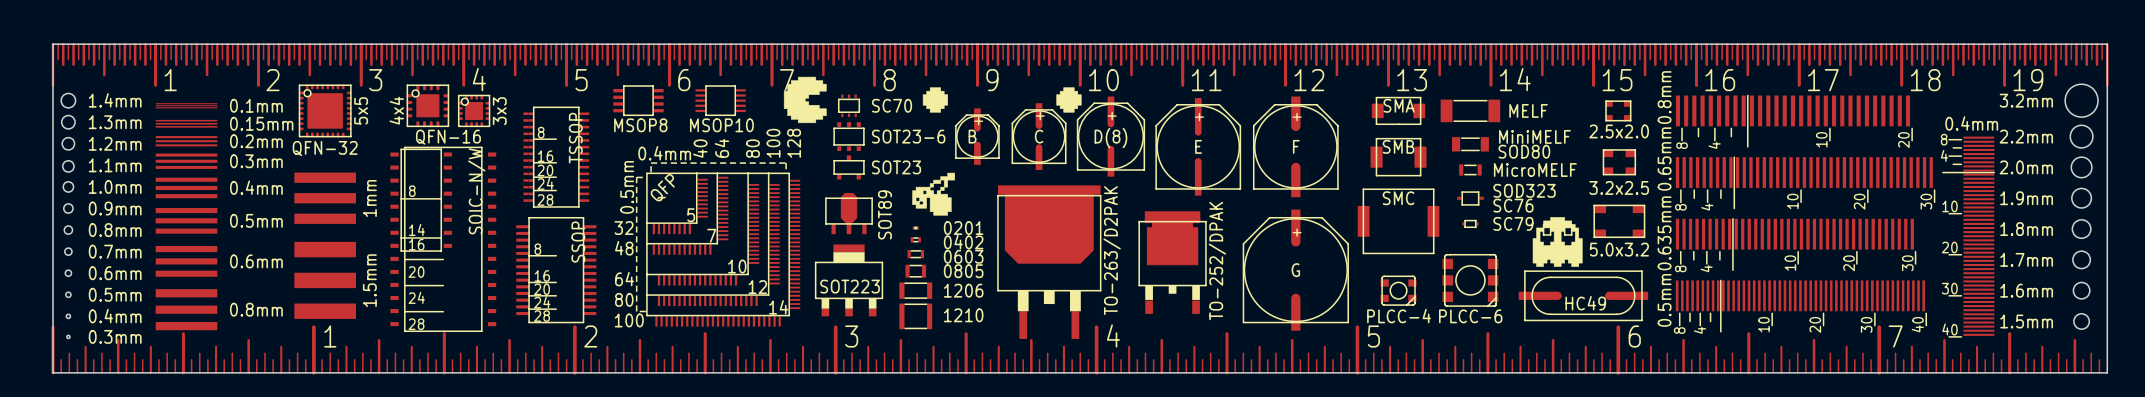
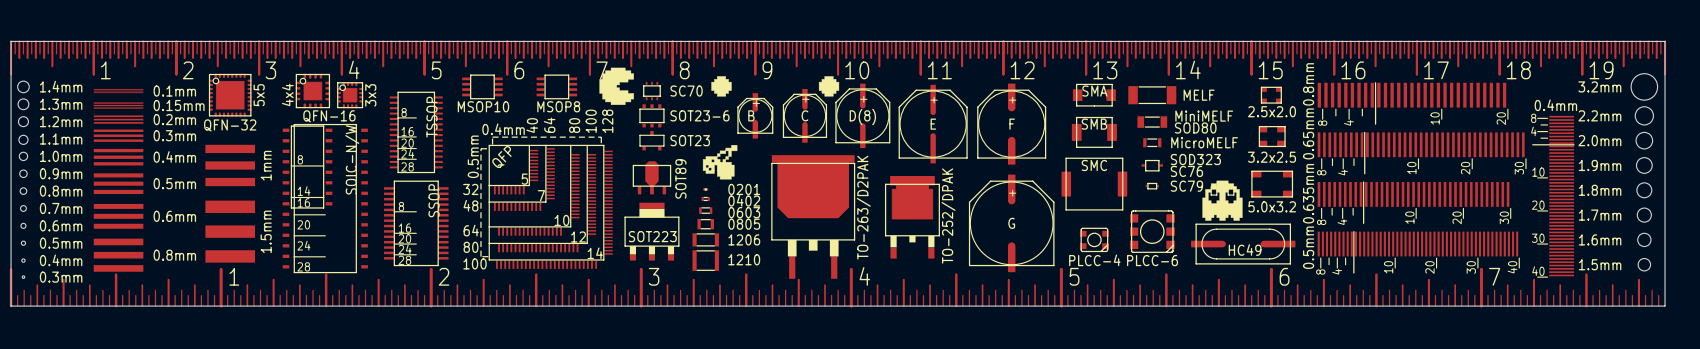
part footprint: [695, 85, 746, 117] -> [536, 74, 578, 100]
text: MSOP8 (640, 125) -> MSOP10 (483, 106)
text: MSOP10 (721, 125) -> MSOP8 (558, 106)

